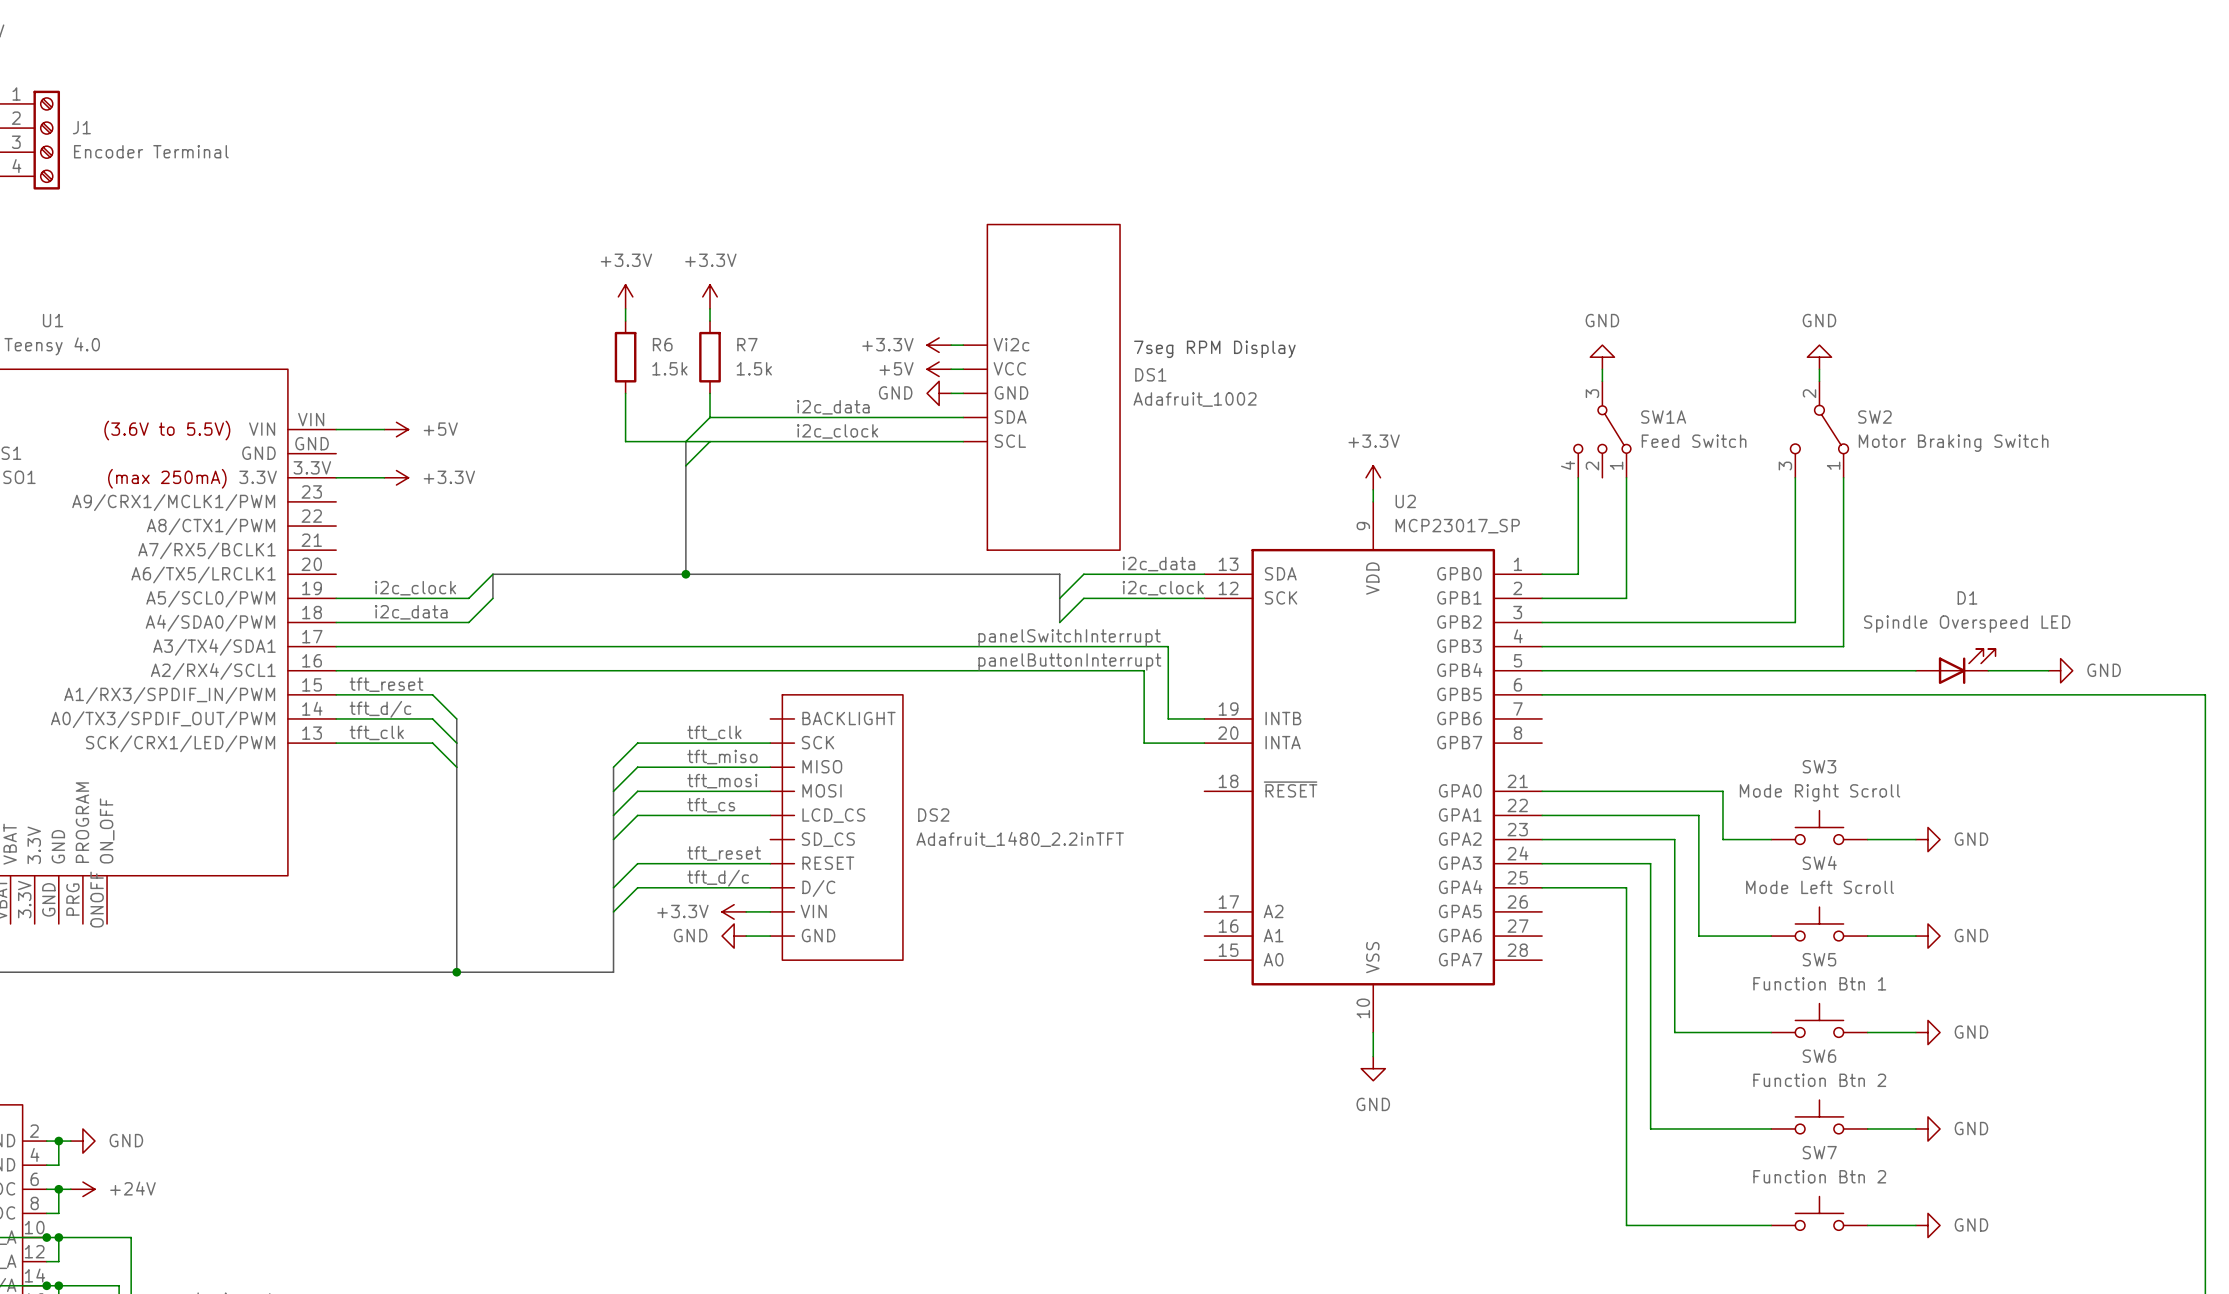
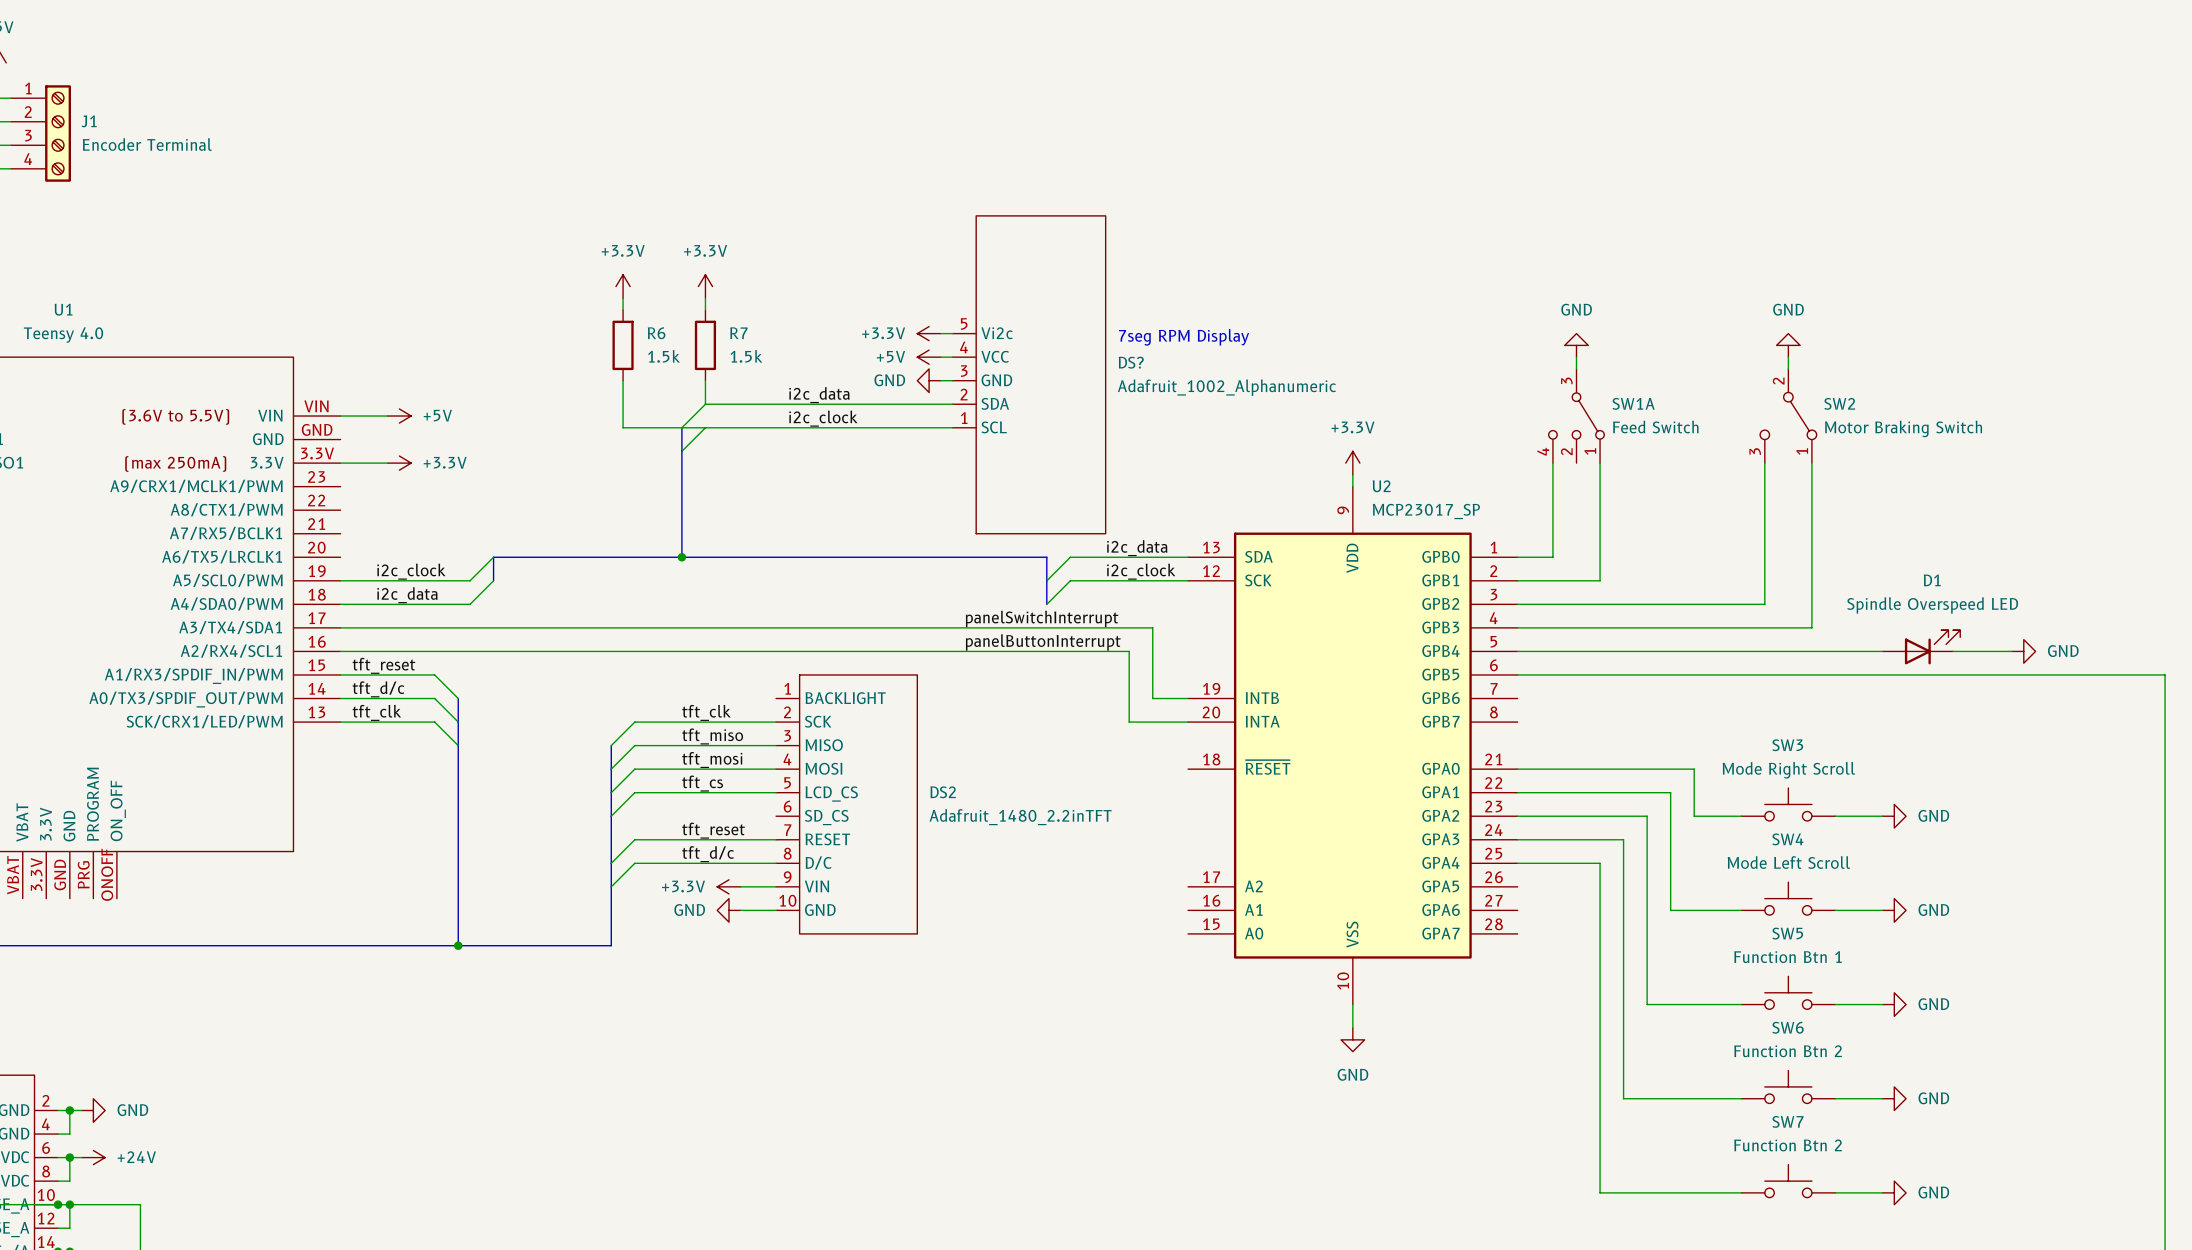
DS1 pin number: none -> 5 (964, 323)
DS1 pin number: none -> 4 (964, 347)
DS1 name: DS1 (1150, 374) -> DS? (1131, 362)
DS1 pin number: none -> 3 (964, 371)
DS1 value: Adafruit_1002 (1195, 399) -> Adafruit_1002_Alphanumeric (1226, 387)
DS1 pin number: none -> 2 (964, 394)
DS1 pin number: none -> 1 (964, 418)
DS2 symbol: [770, 694, 903, 961] -> [776, 674, 918, 934]

